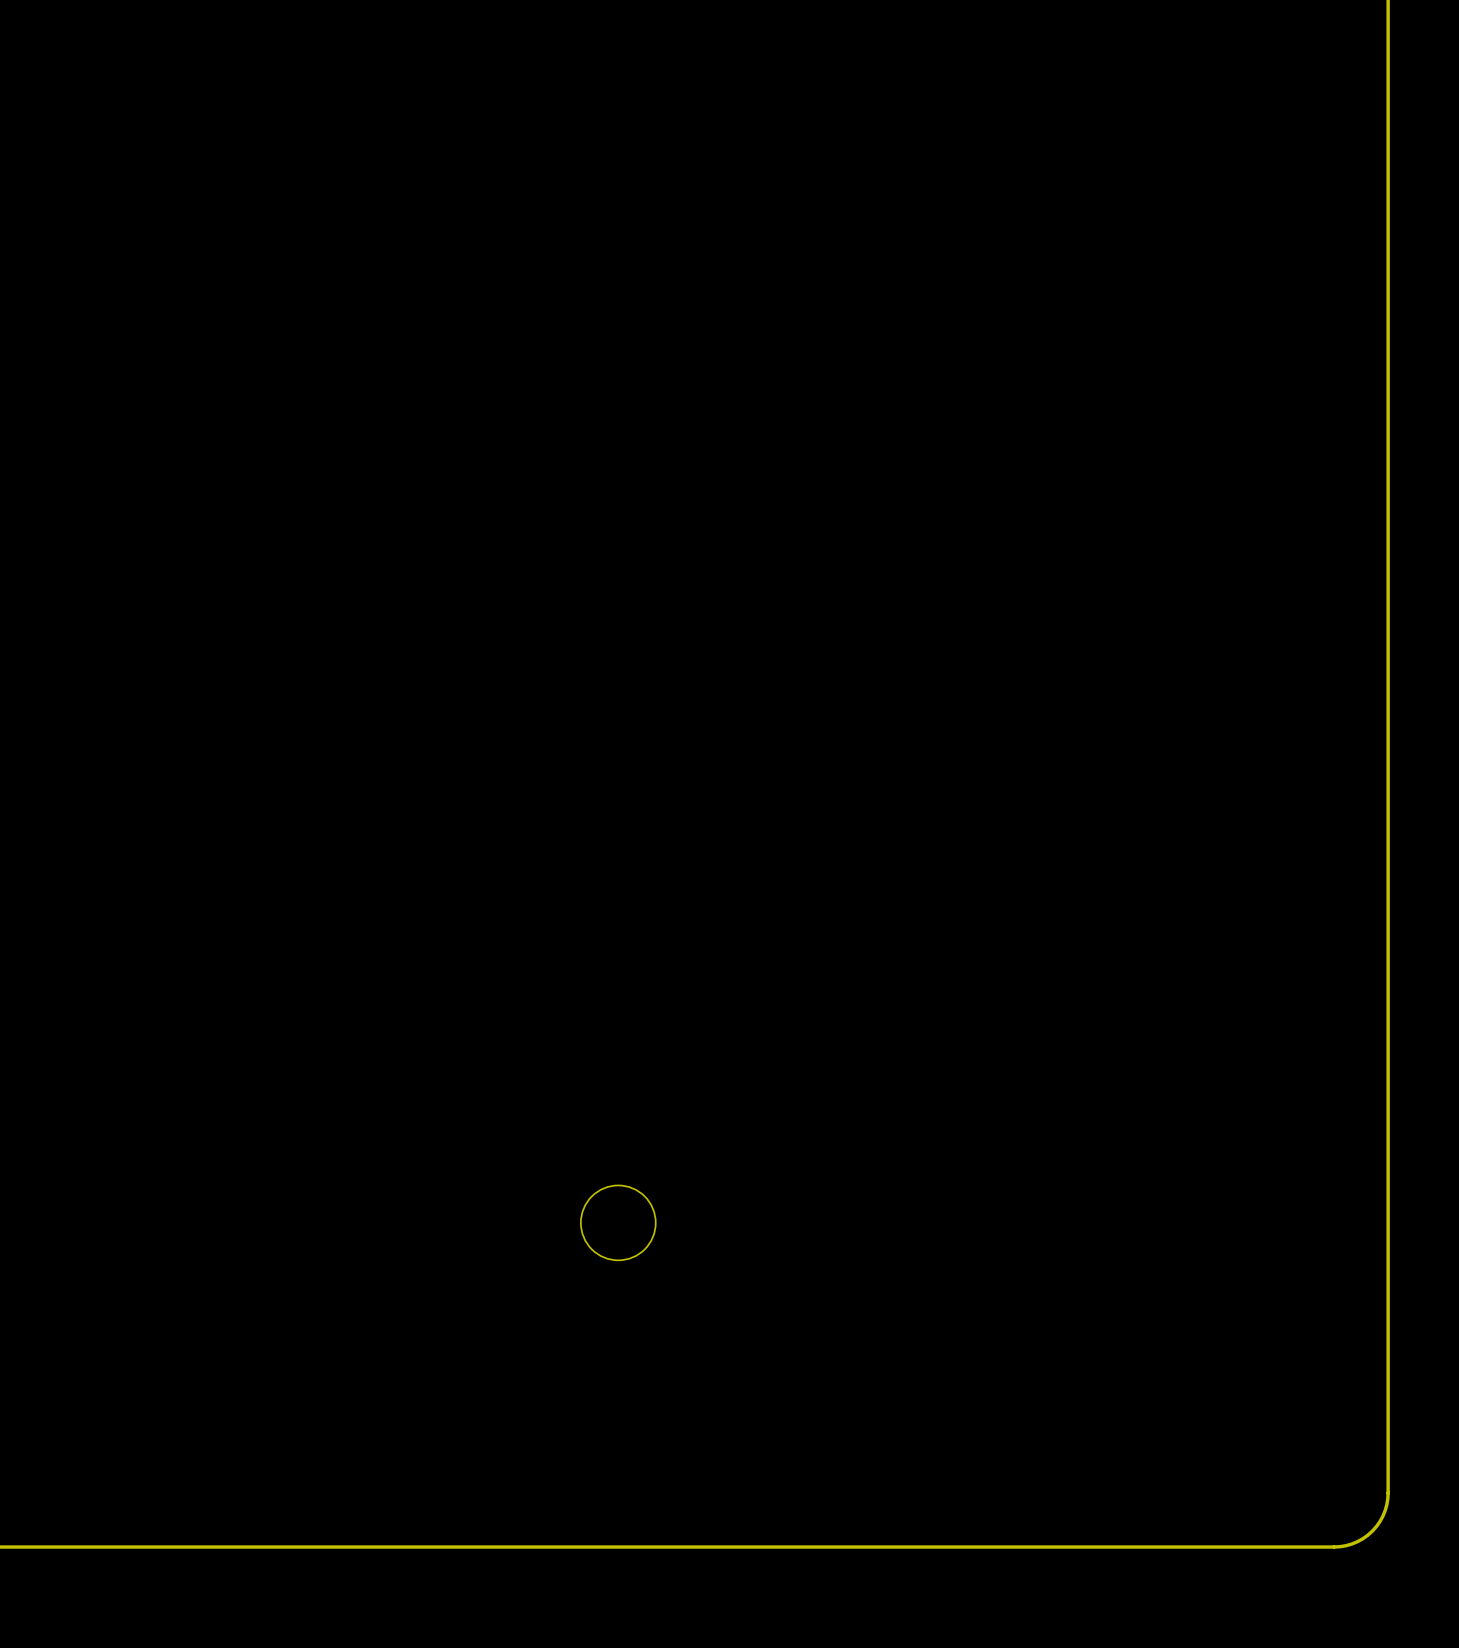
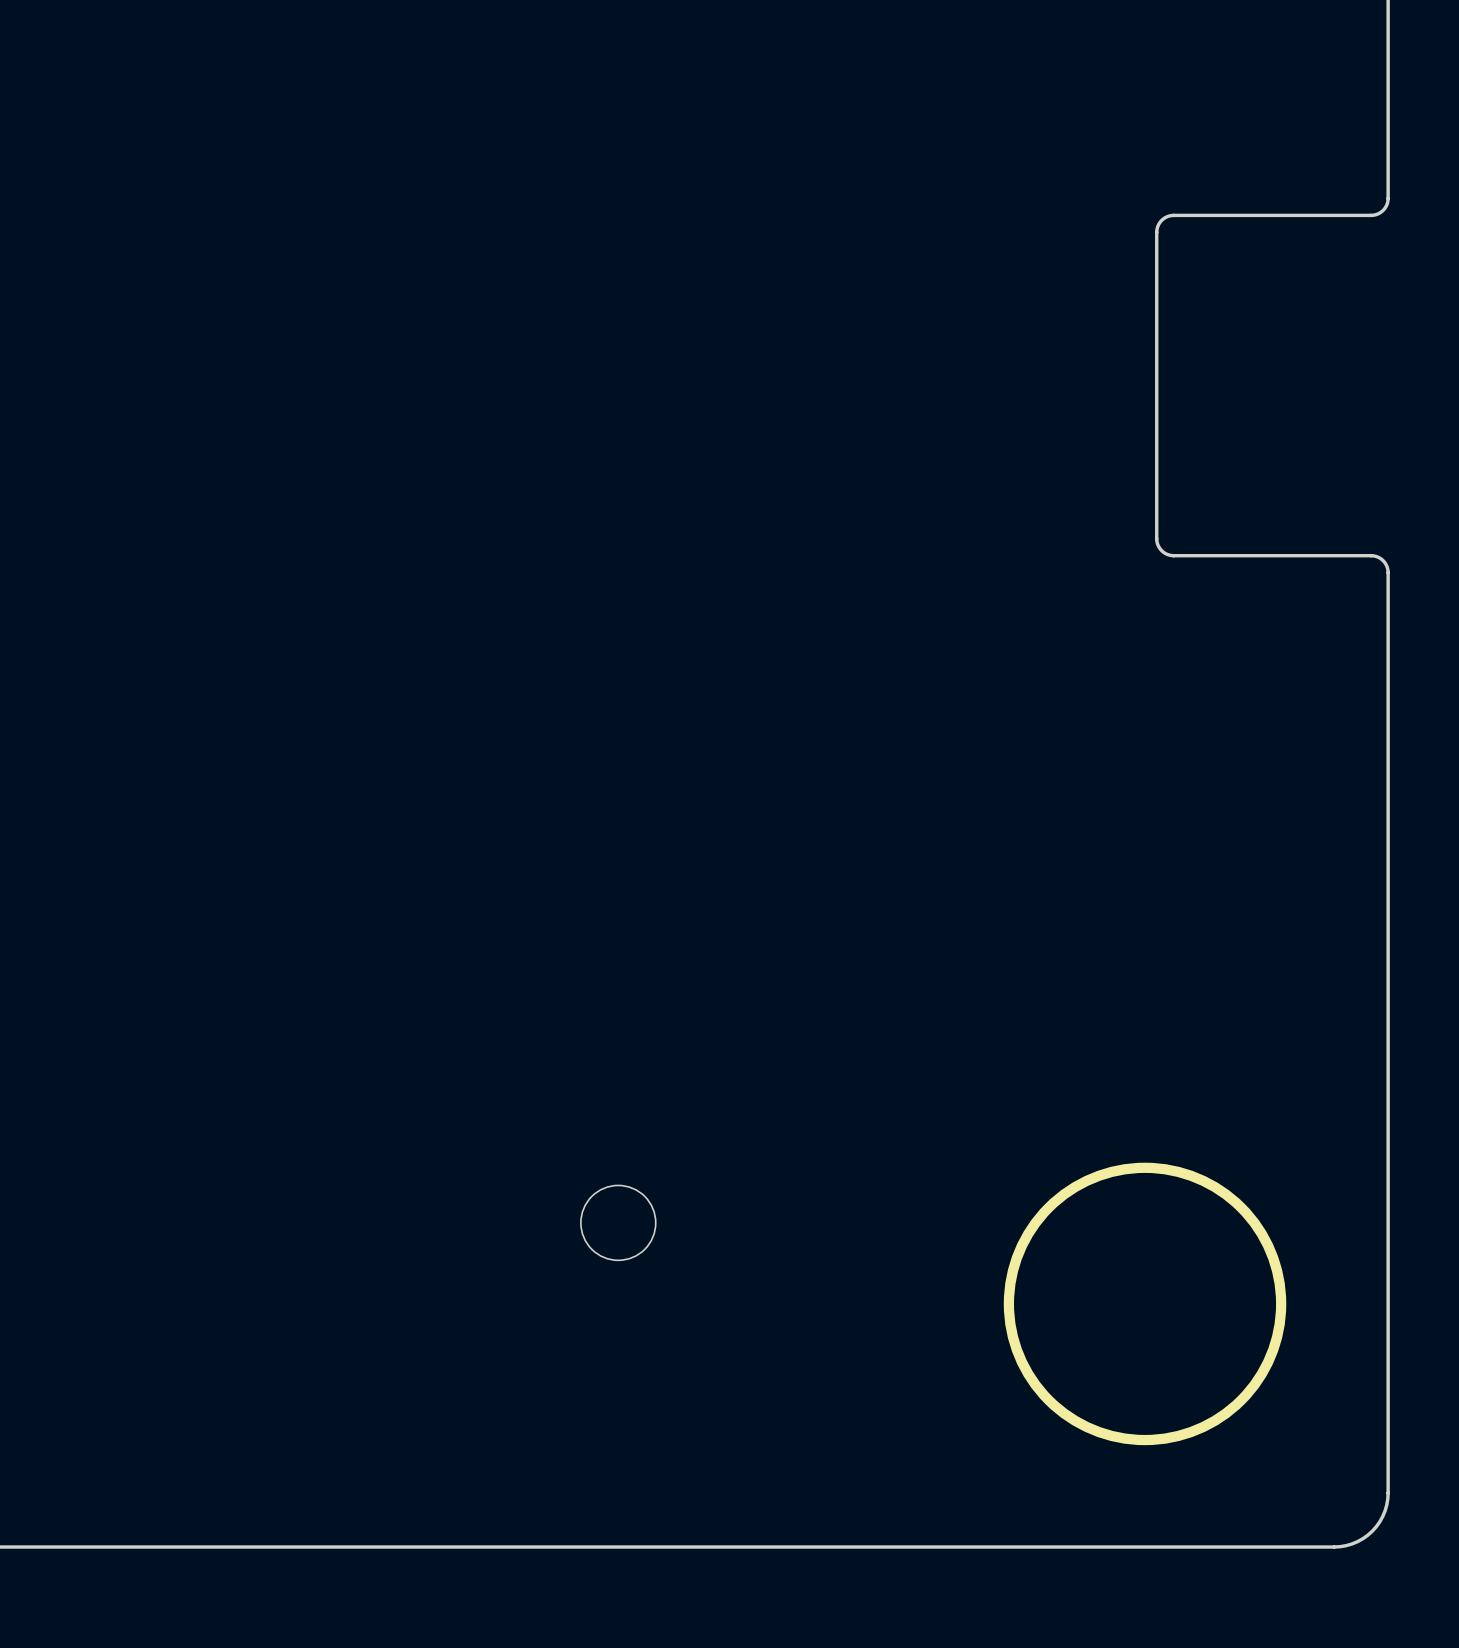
board edge: (1388, 198) (1388, 572) -> (1388, 198) (1383, 210) (1373, 215) (1171, 215) (1160, 222) (1156, 232) (1156, 538) (1160, 549) (1165, 553) (1173, 555) (1373, 555) (1383, 560) (1388, 572)
drawing: none -> [1003, 1162, 1287, 1446]

